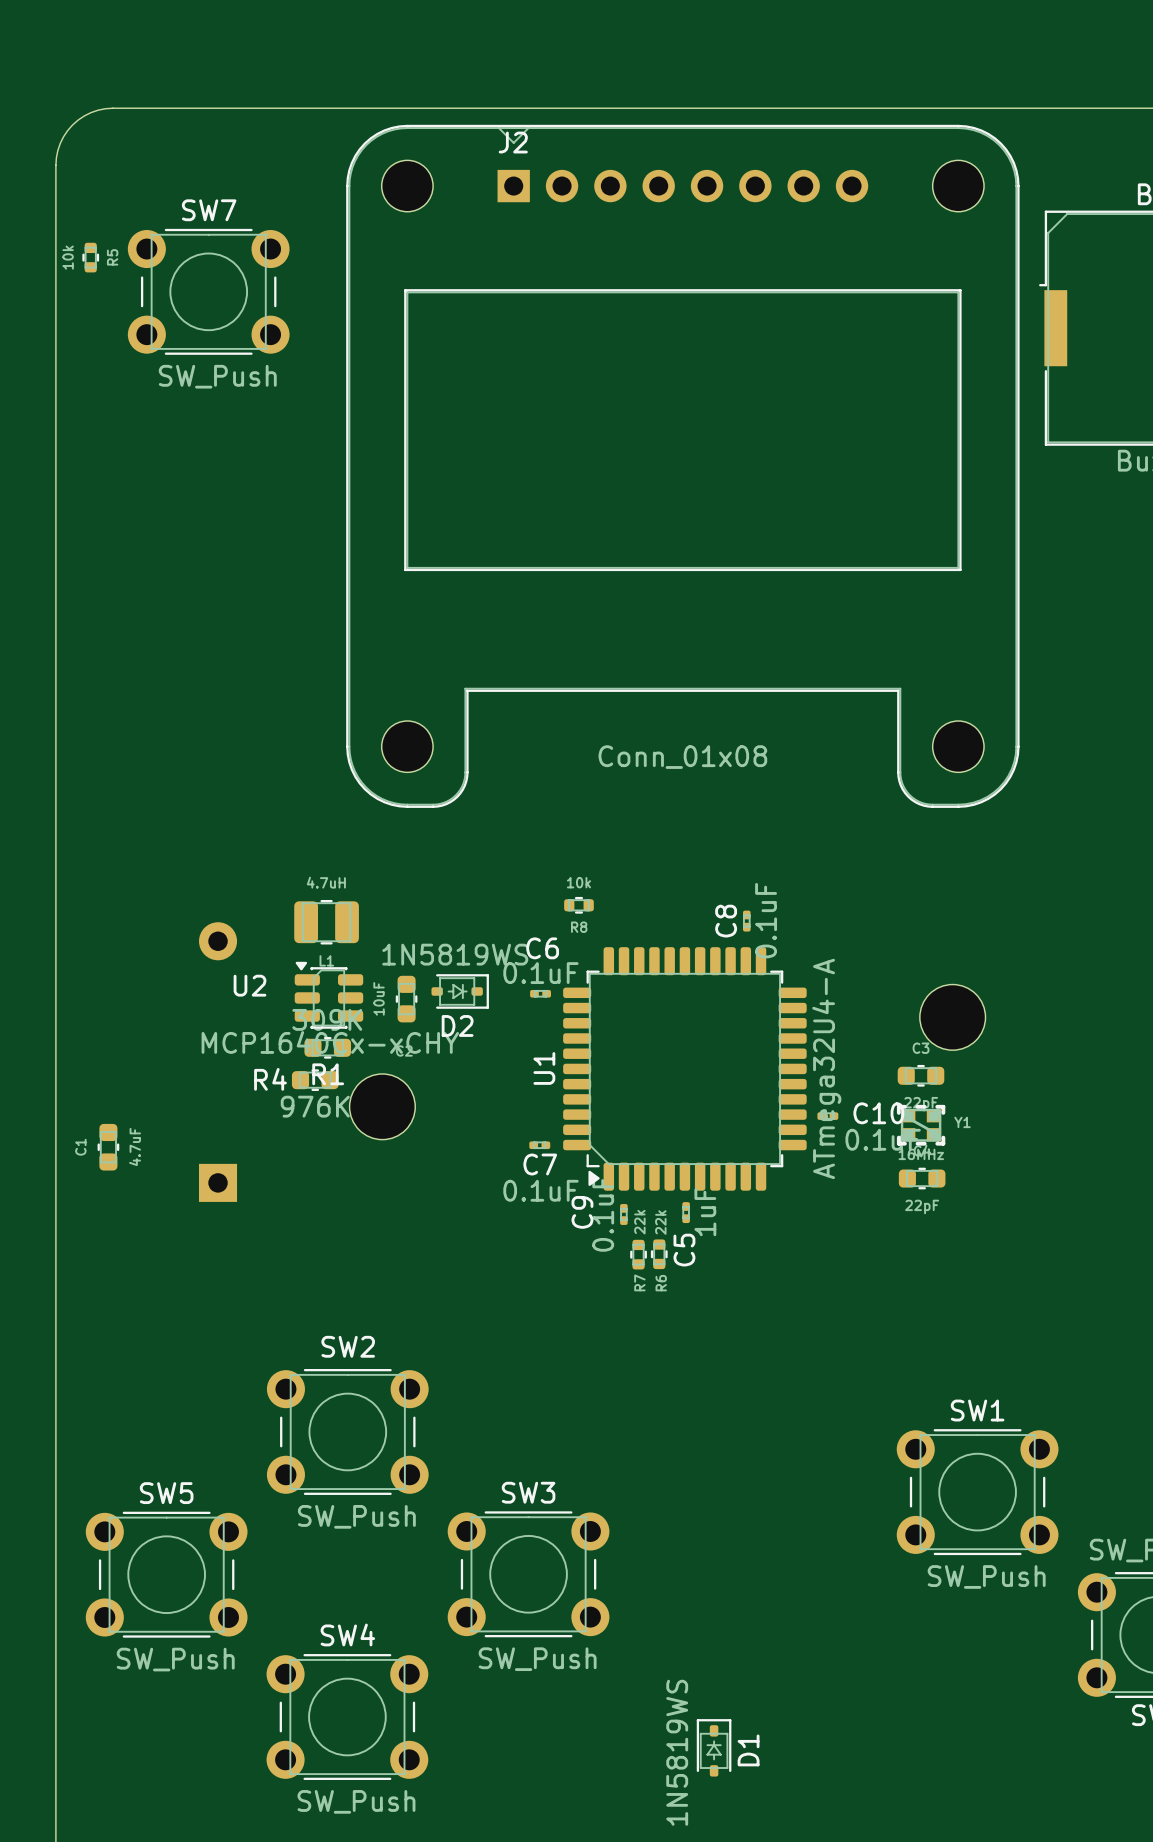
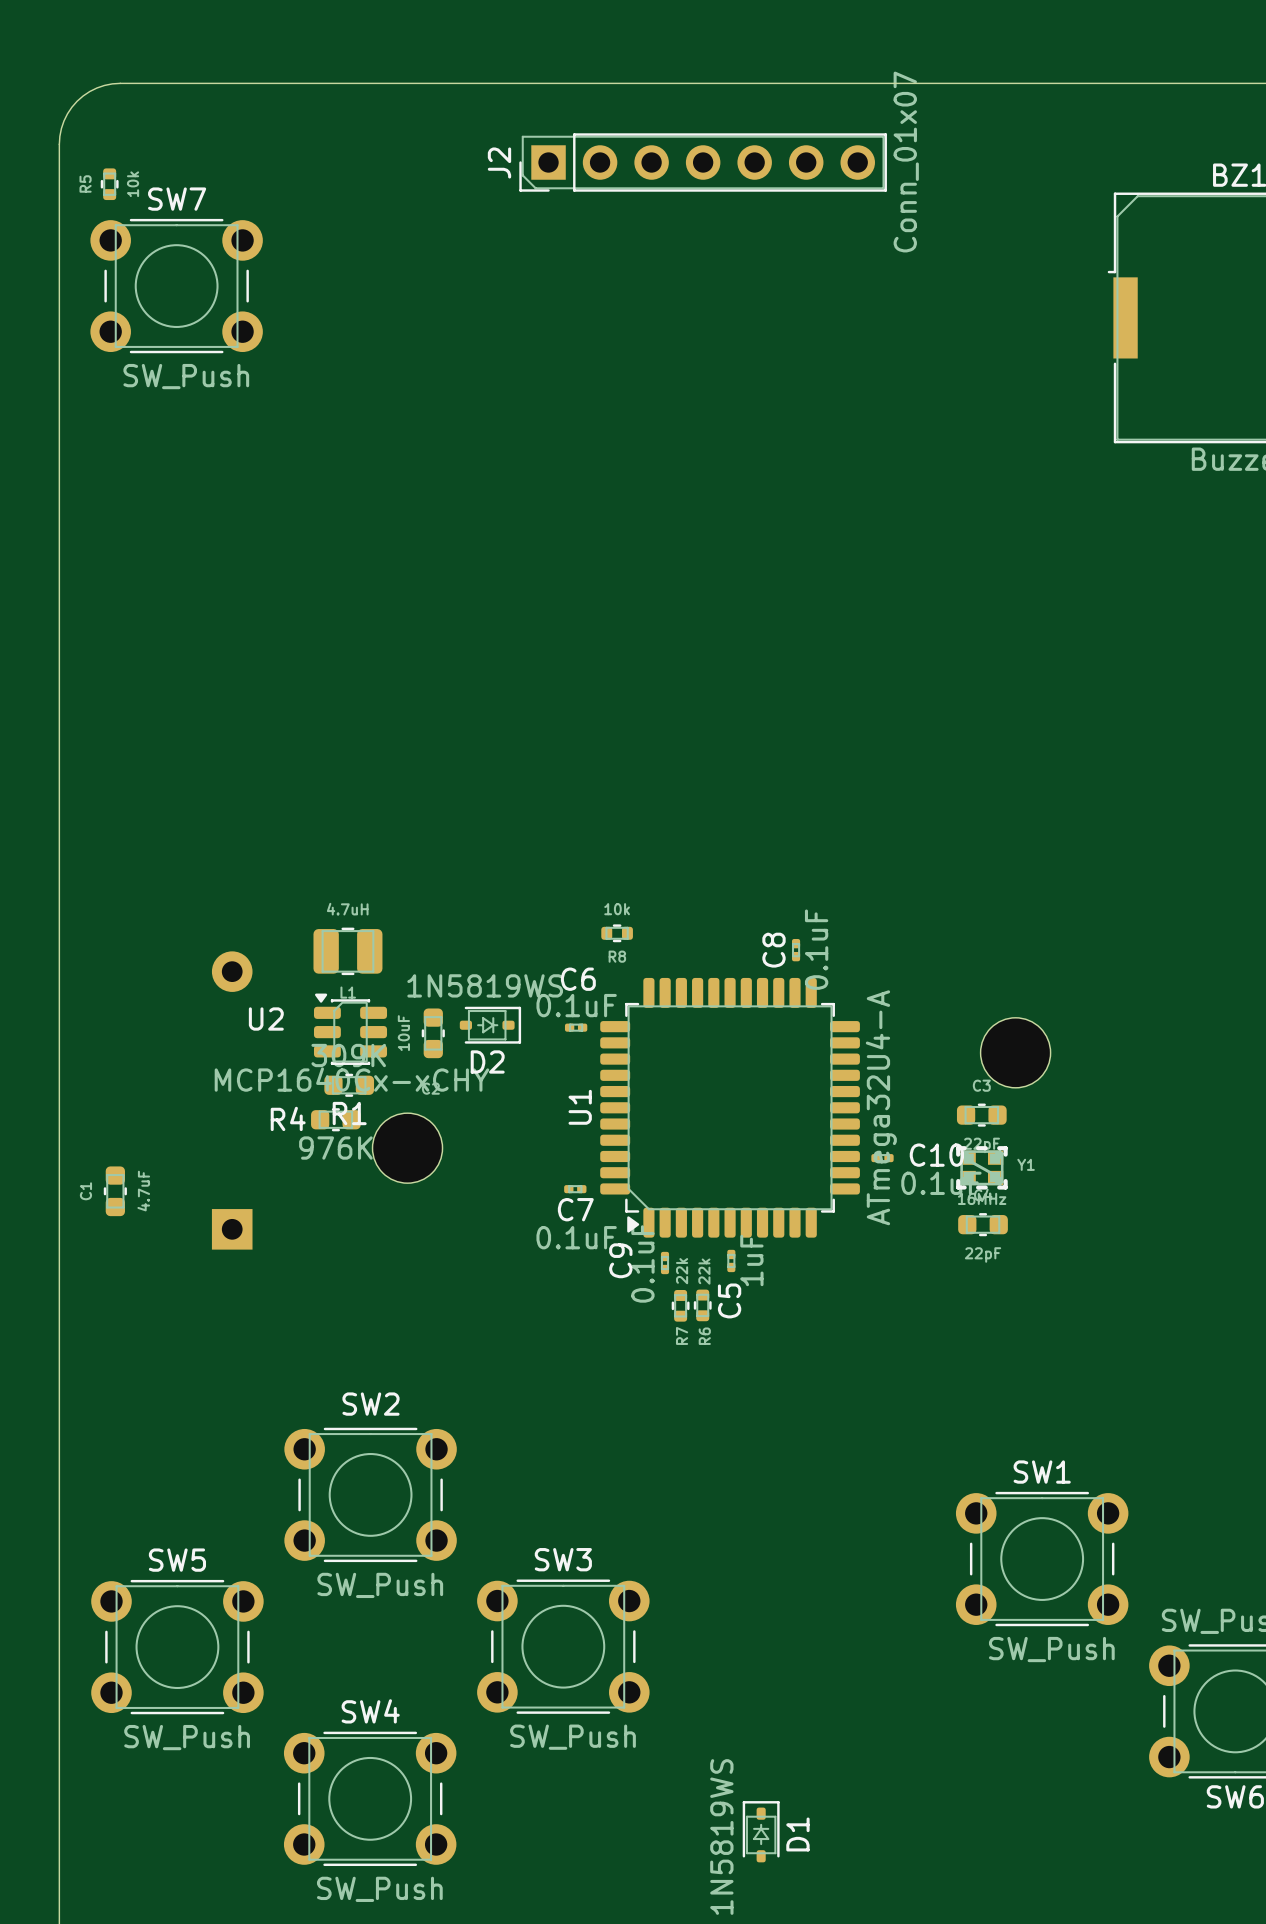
J2 footprint: [346, 124, 1020, 808] -> [519, 133, 887, 192]
J2 name position: J2 (513, 142) -> J2 (499, 162)
R5 value position: 10k (68, 257) -> 10k (133, 184)
R5 position: (90, 257) -> (109, 184)
R5 name position: R5 (112, 257) -> R5 (85, 183)
SW7 position: (208, 291) -> (176, 286)
J2 value: Conn_01x08 (682, 757) -> Conn_01x07 (906, 162)

